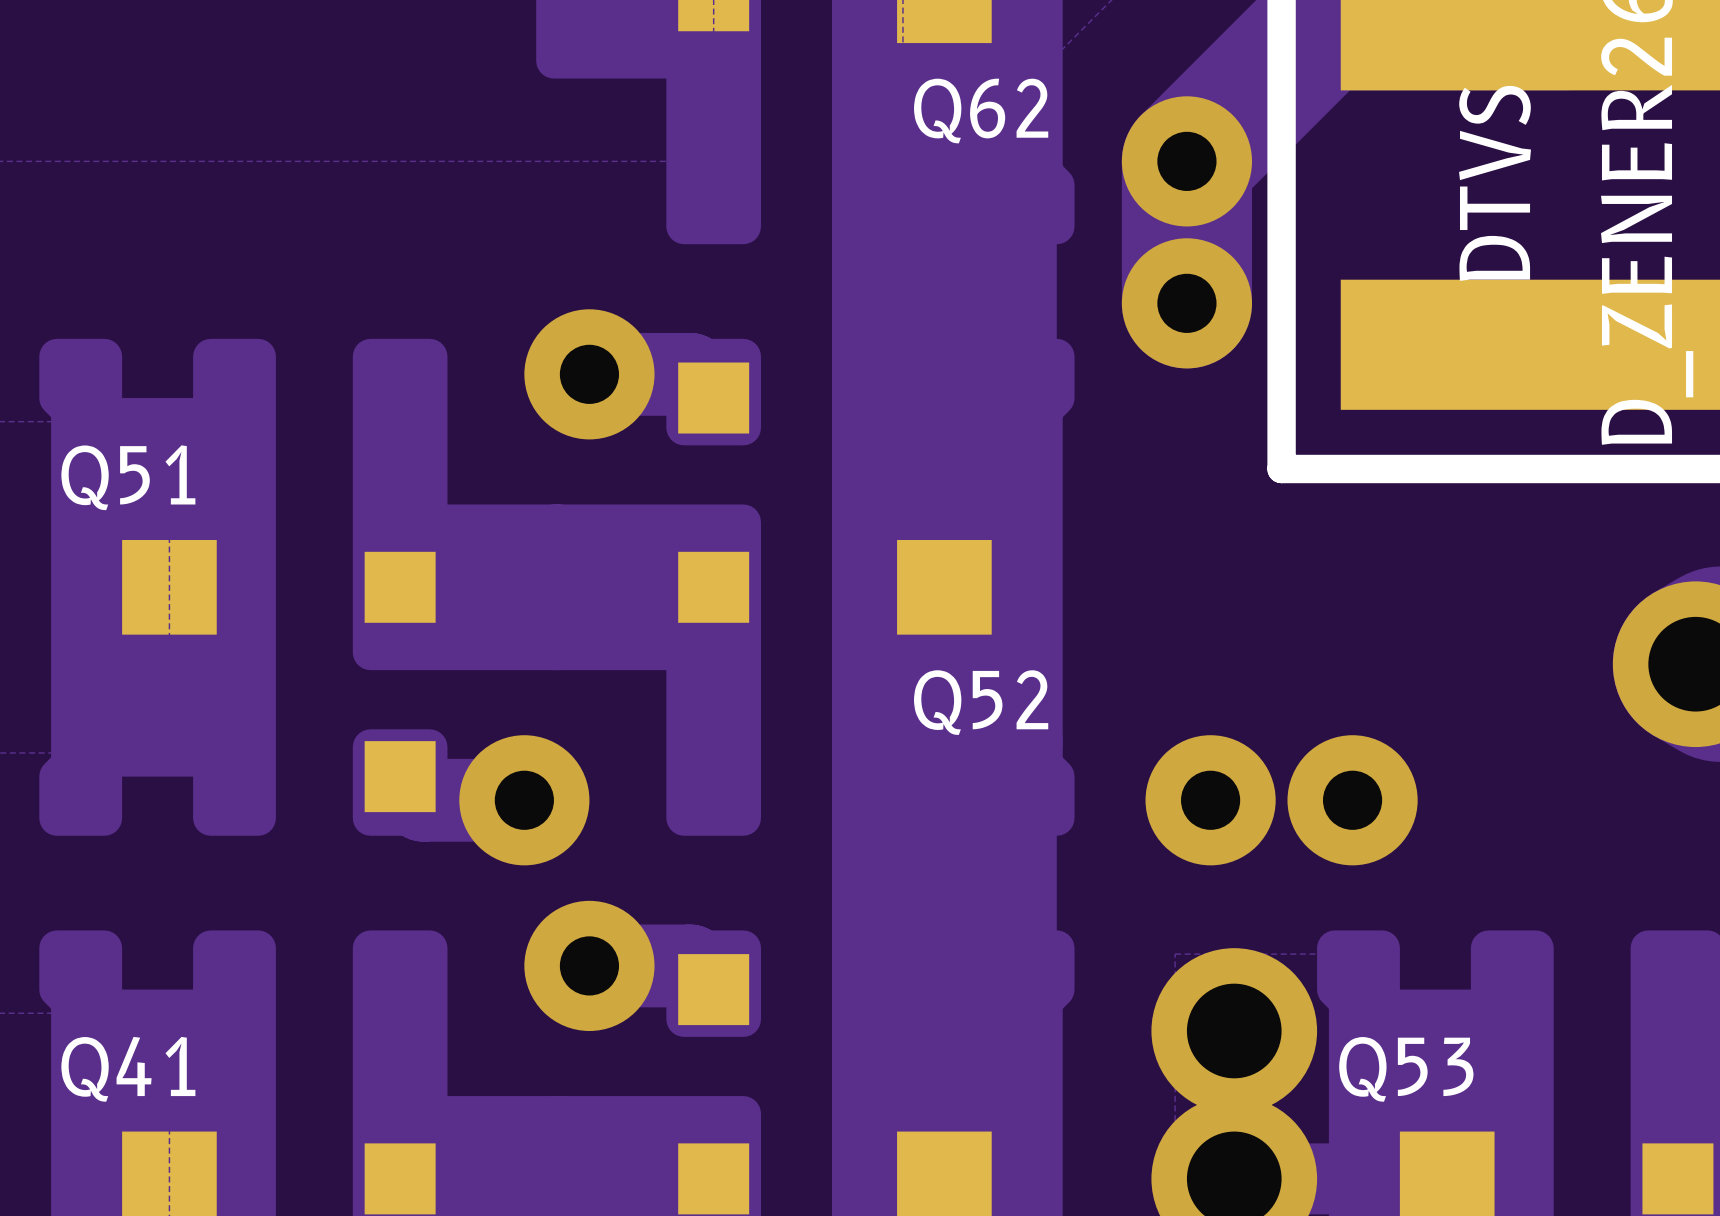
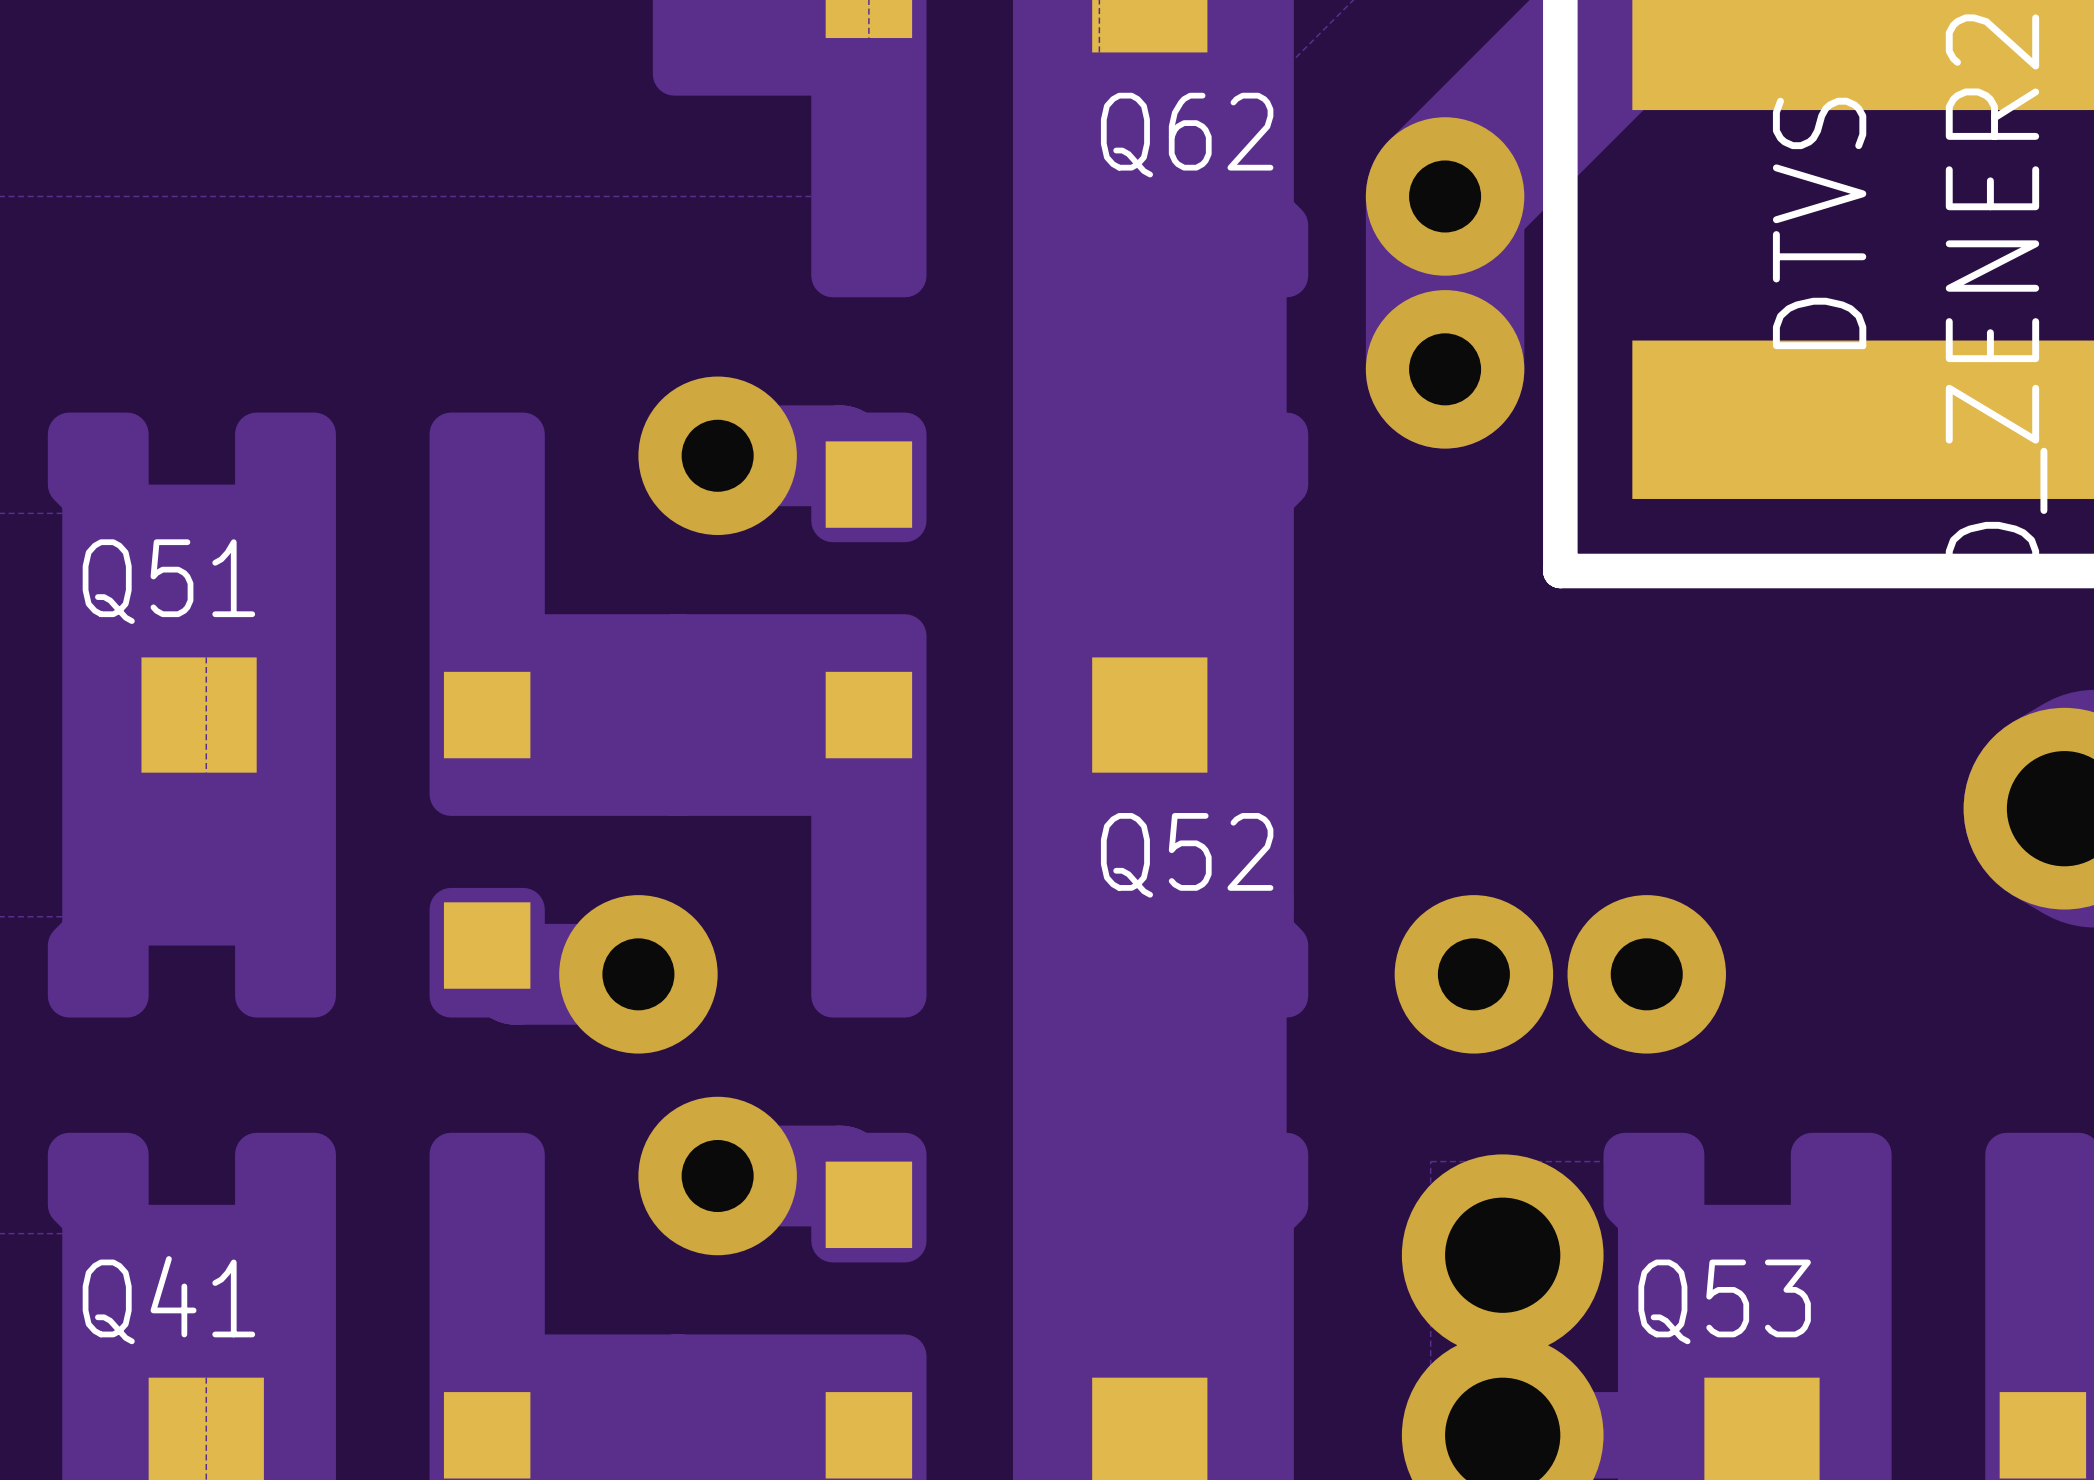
Q51 footprint: [39, 338, 578, 836] -> [47, 412, 704, 1018]

